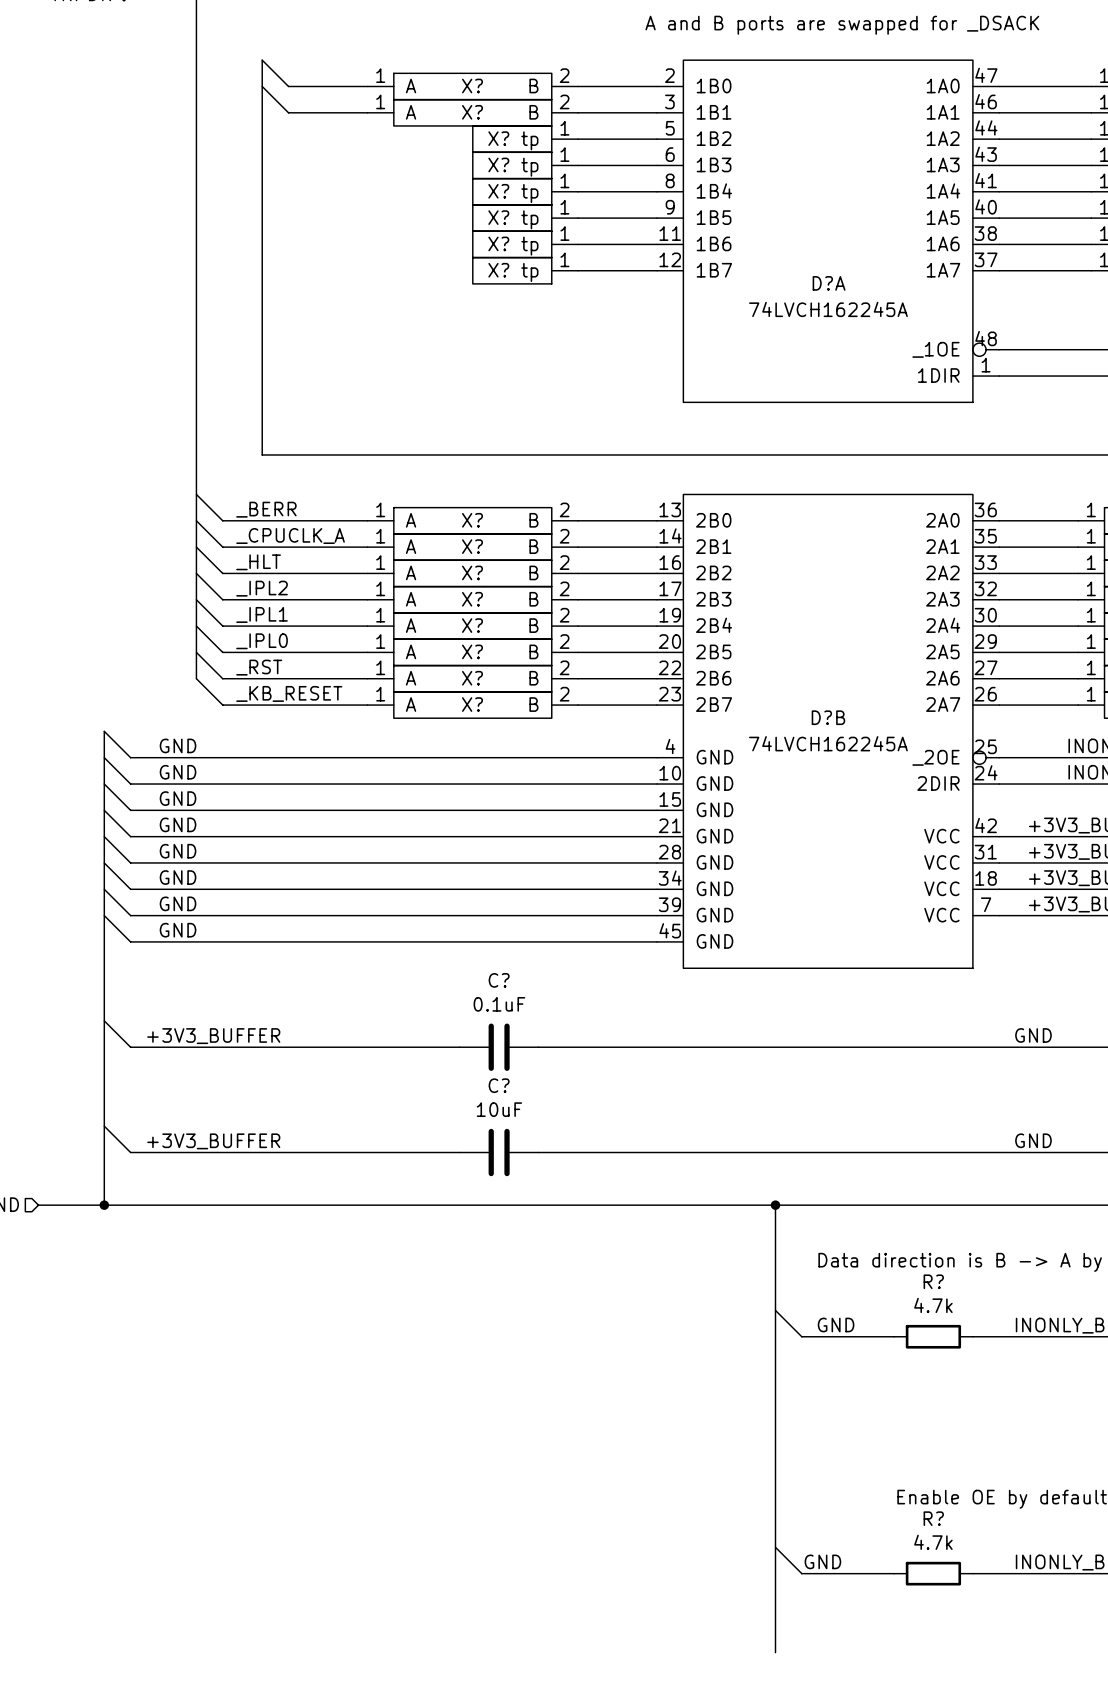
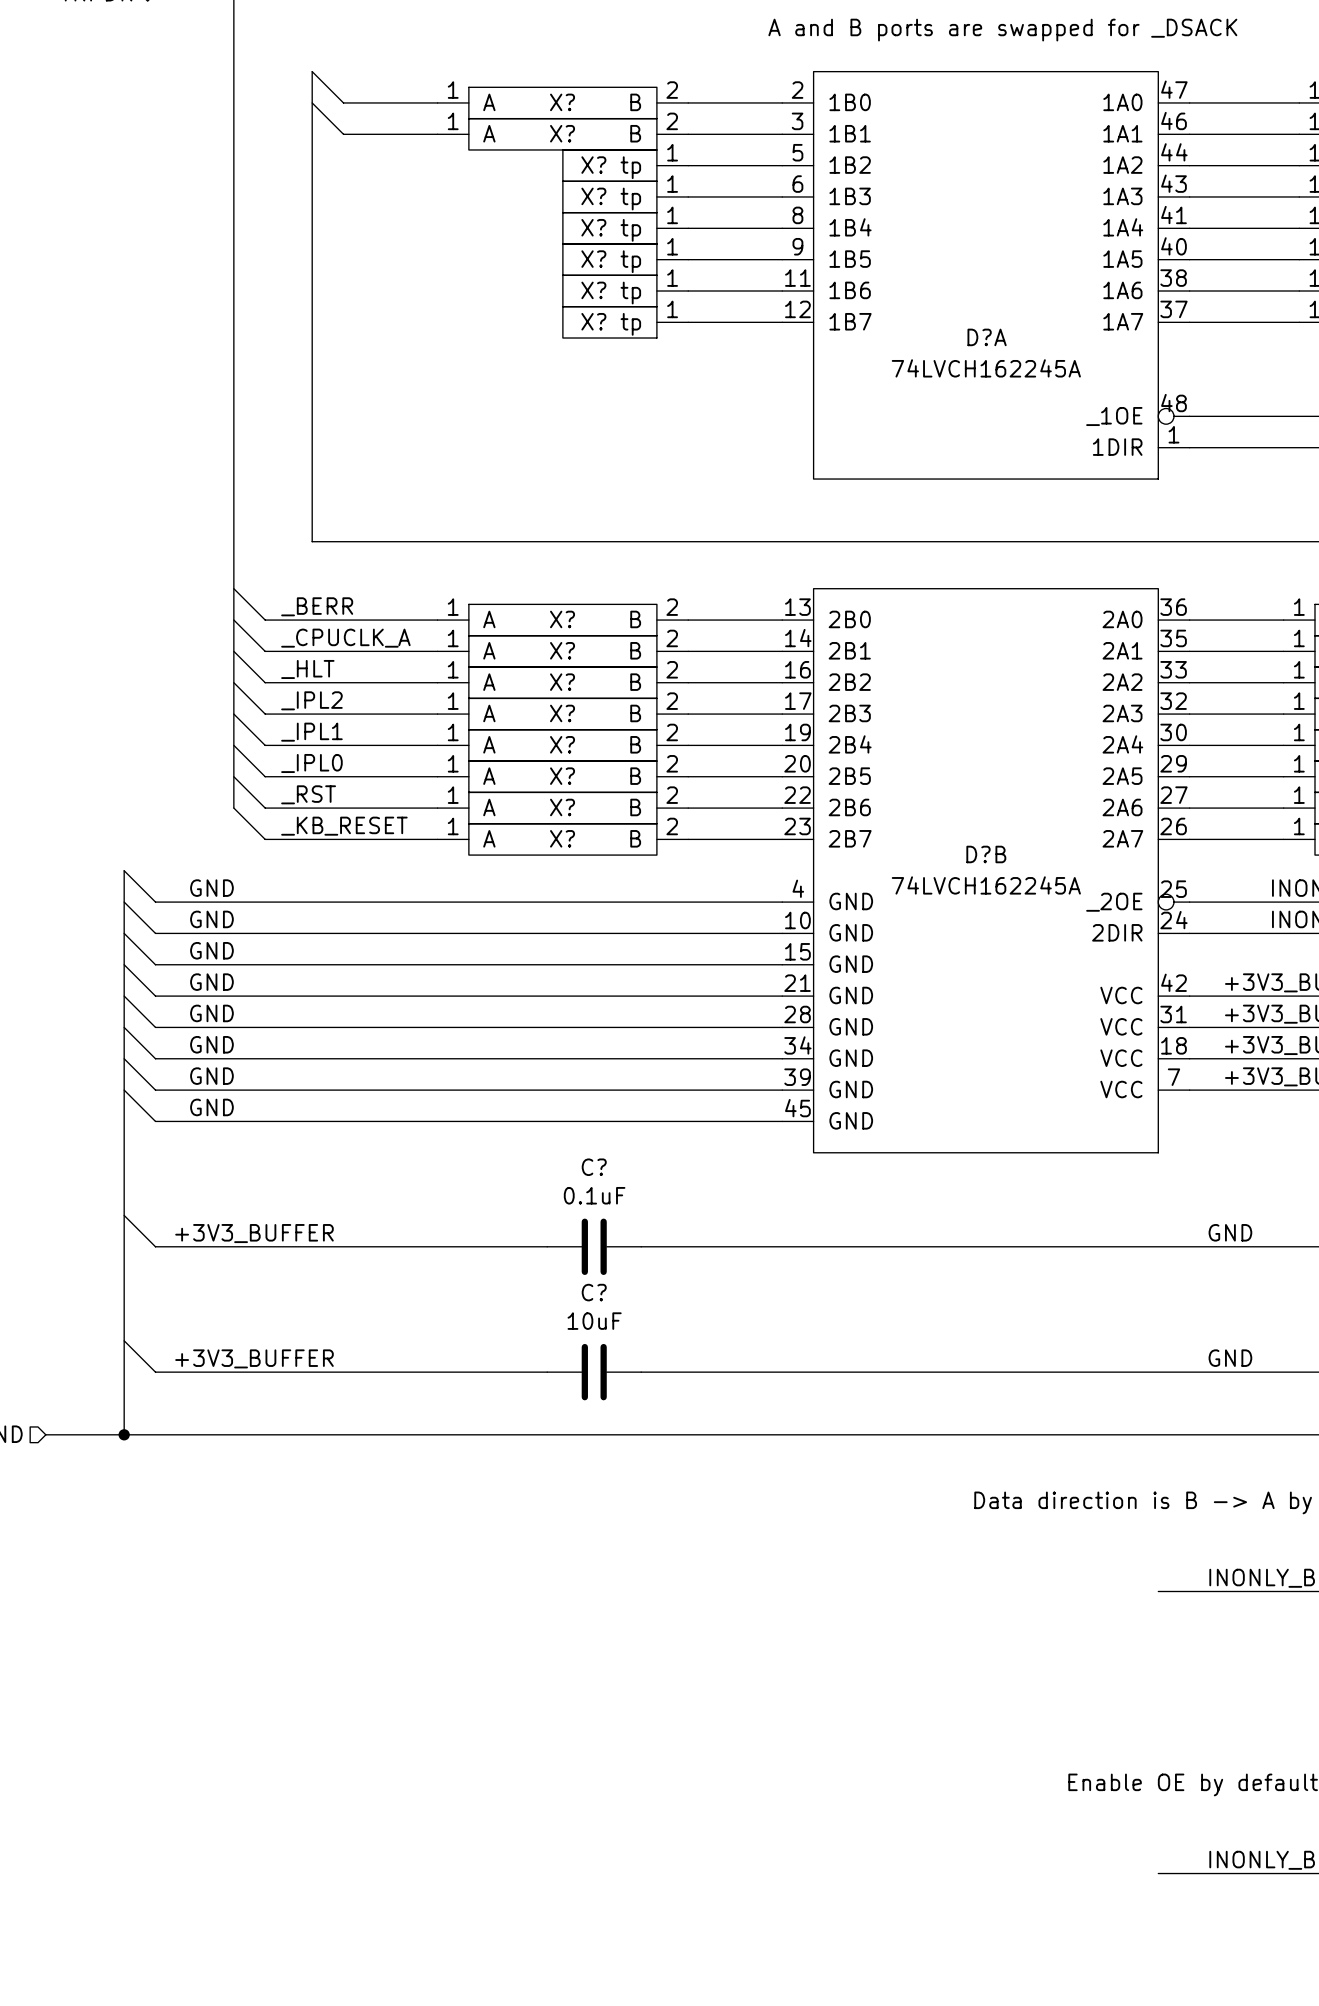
bus: (775, 1205) (775, 1652) -> none
junction: (775, 1205) -> none
wire: (775, 1310) (801, 1336) (893, 1336) -> none
label: GND (836, 1325) -> none
R?: 4.7k (933, 1336) -> none
wire: (775, 1547) (801, 1573) (893, 1573) -> none
label: GND (822, 1561) -> none
R?: 4.7k (933, 1573) -> none

